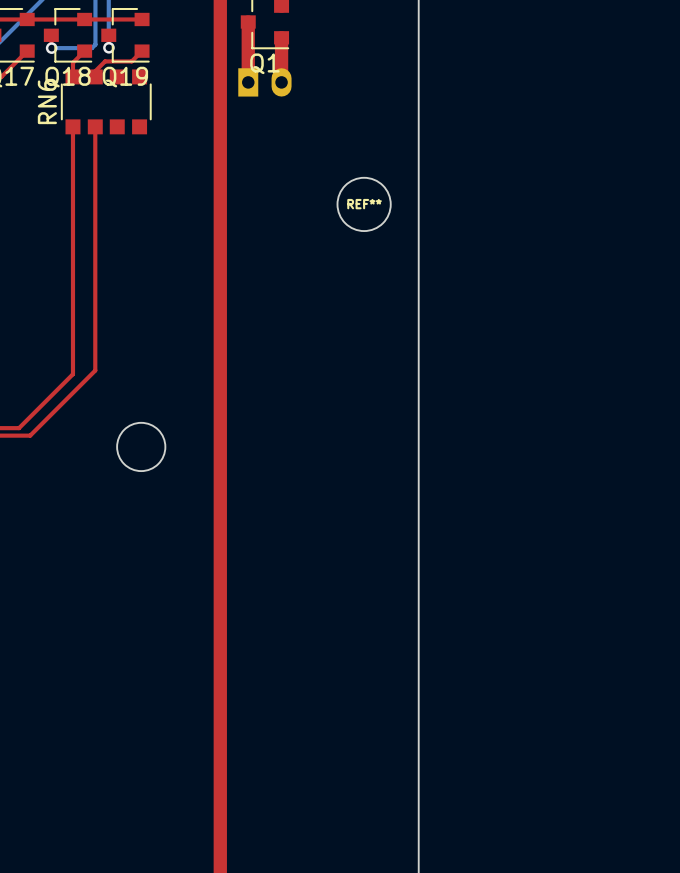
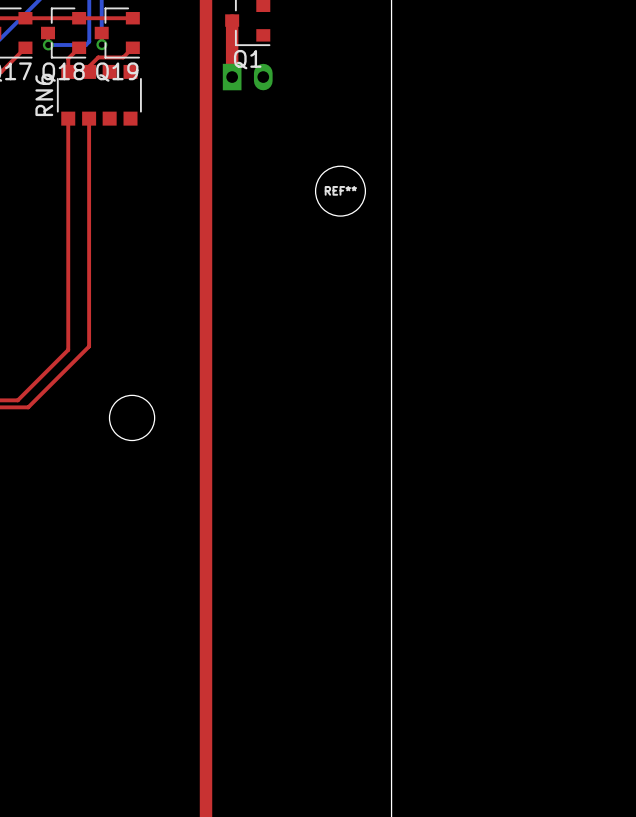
top track: (281, 37) (281, 82) -> none

